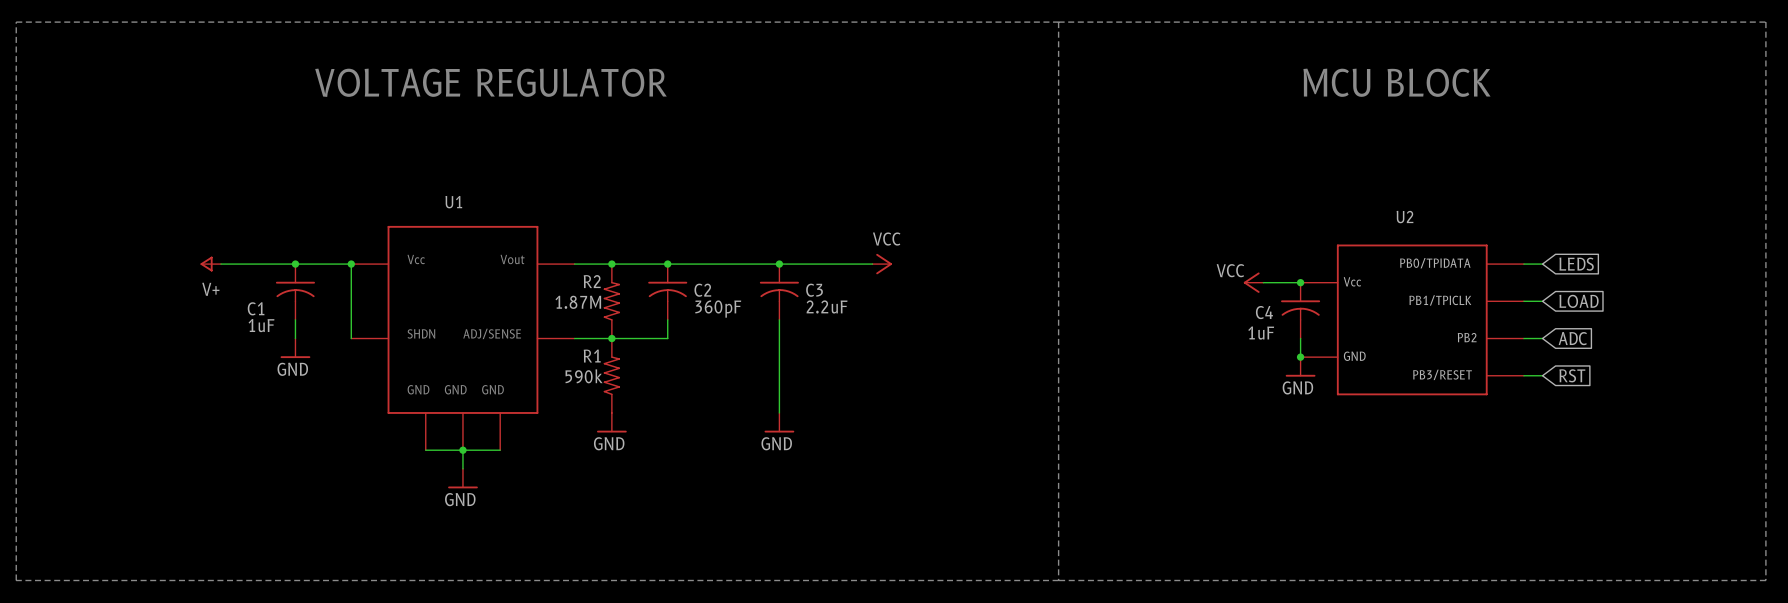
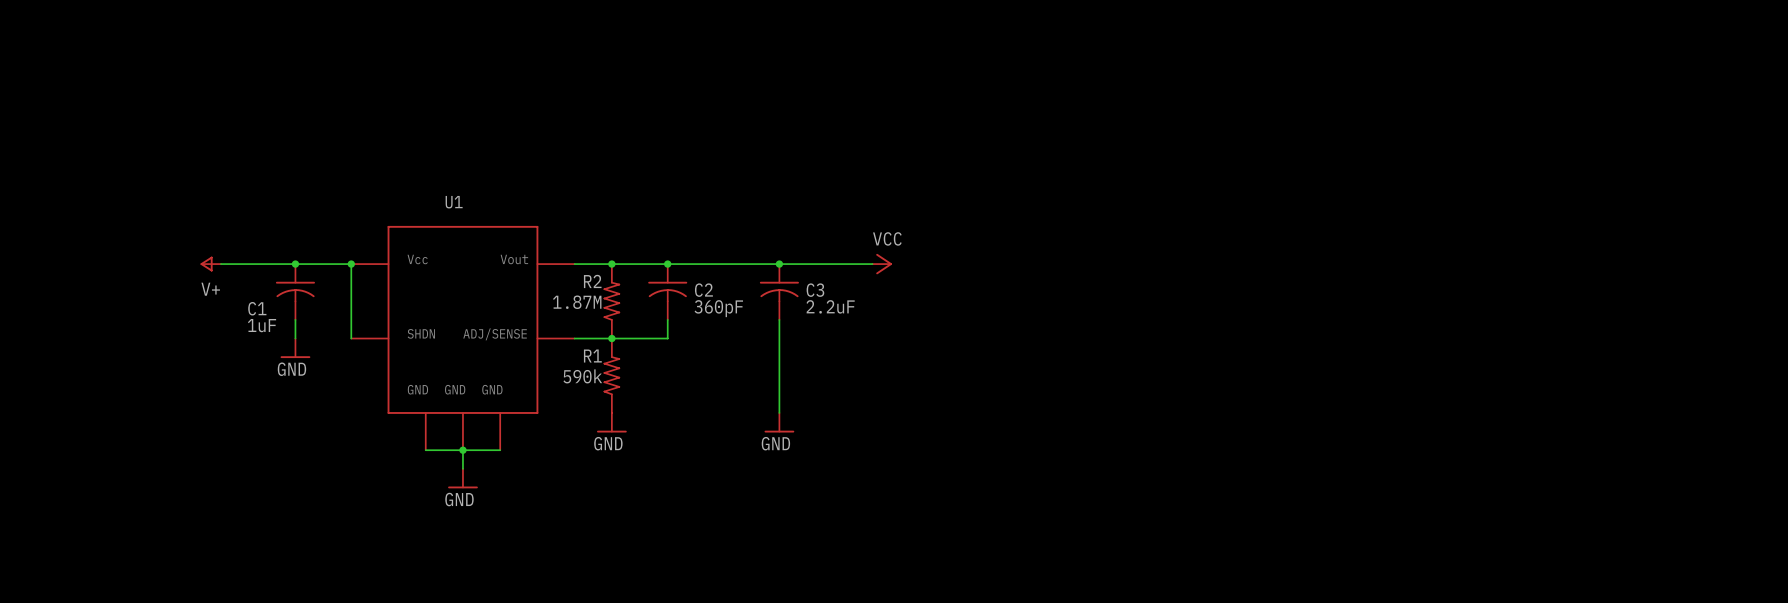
line: (16, 22) (1765, 22) (1765, 580) (16, 580) (16, 22) -> none
line: (1058, 22) (1058, 580) -> none
text: VOLTAGE REGULATOR (490, 82) -> none
text: MCU BLOCK (1396, 82) -> none
wire: (1523, 264) (1542, 264) -> none
global label: LEDS (1576, 264) -> none
power symbol: VCC (1253, 282) -> none
wire: (1263, 282) (1300, 282) -> none
junction: (1300, 282) -> none
wire: (1523, 301) (1542, 301) -> none
global label: LOAD (1579, 301) -> none
C4: 1uF (1300, 310) -> none
U2: (1412, 319) -> none
wire: (1300, 338) (1300, 357) -> none
wire: (1523, 338) (1542, 338) -> none
global label: ADC (1572, 338) -> none
junction: (1300, 357) -> none
power symbol: GND (1300, 366) -> none
wire: (1523, 375) (1542, 375) -> none
global label: RST (1572, 375) -> none

